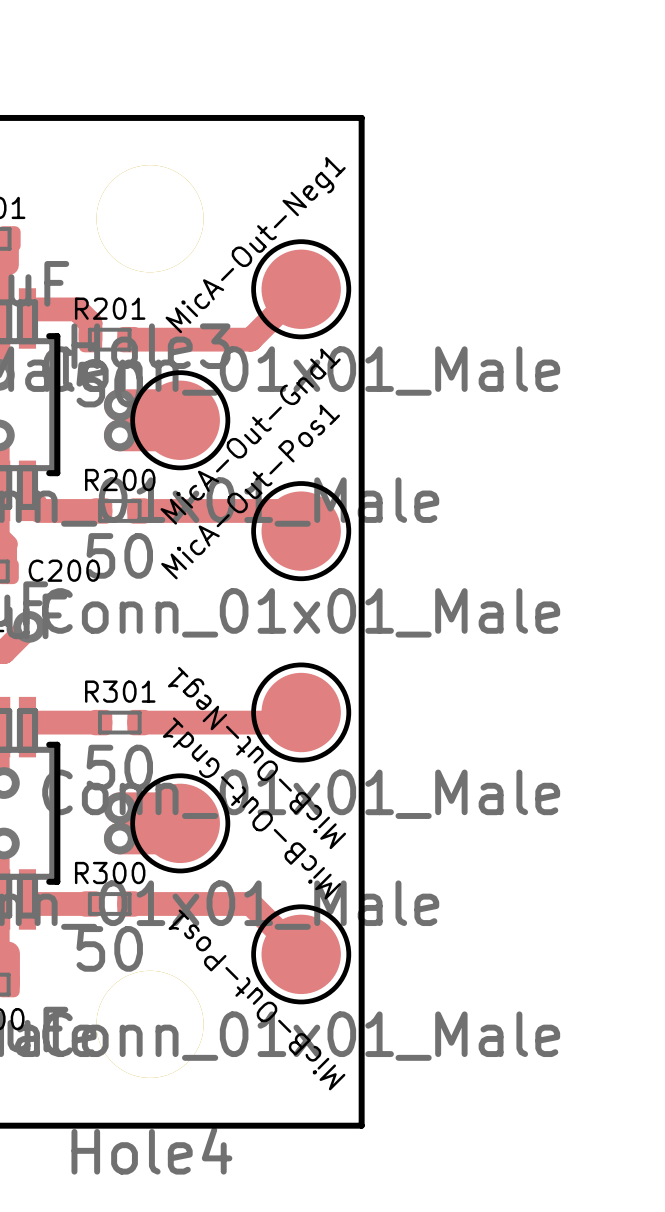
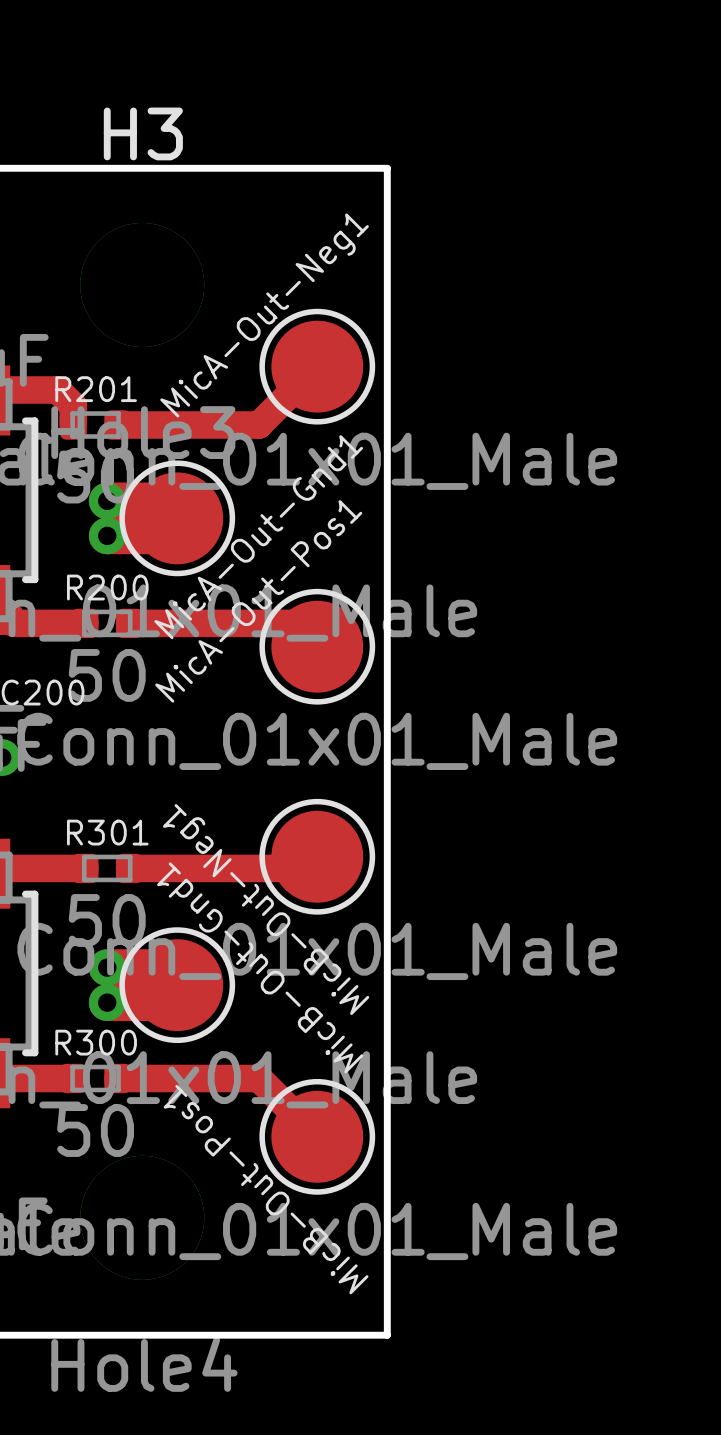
H3 name: none -> H3 (143, 133)

